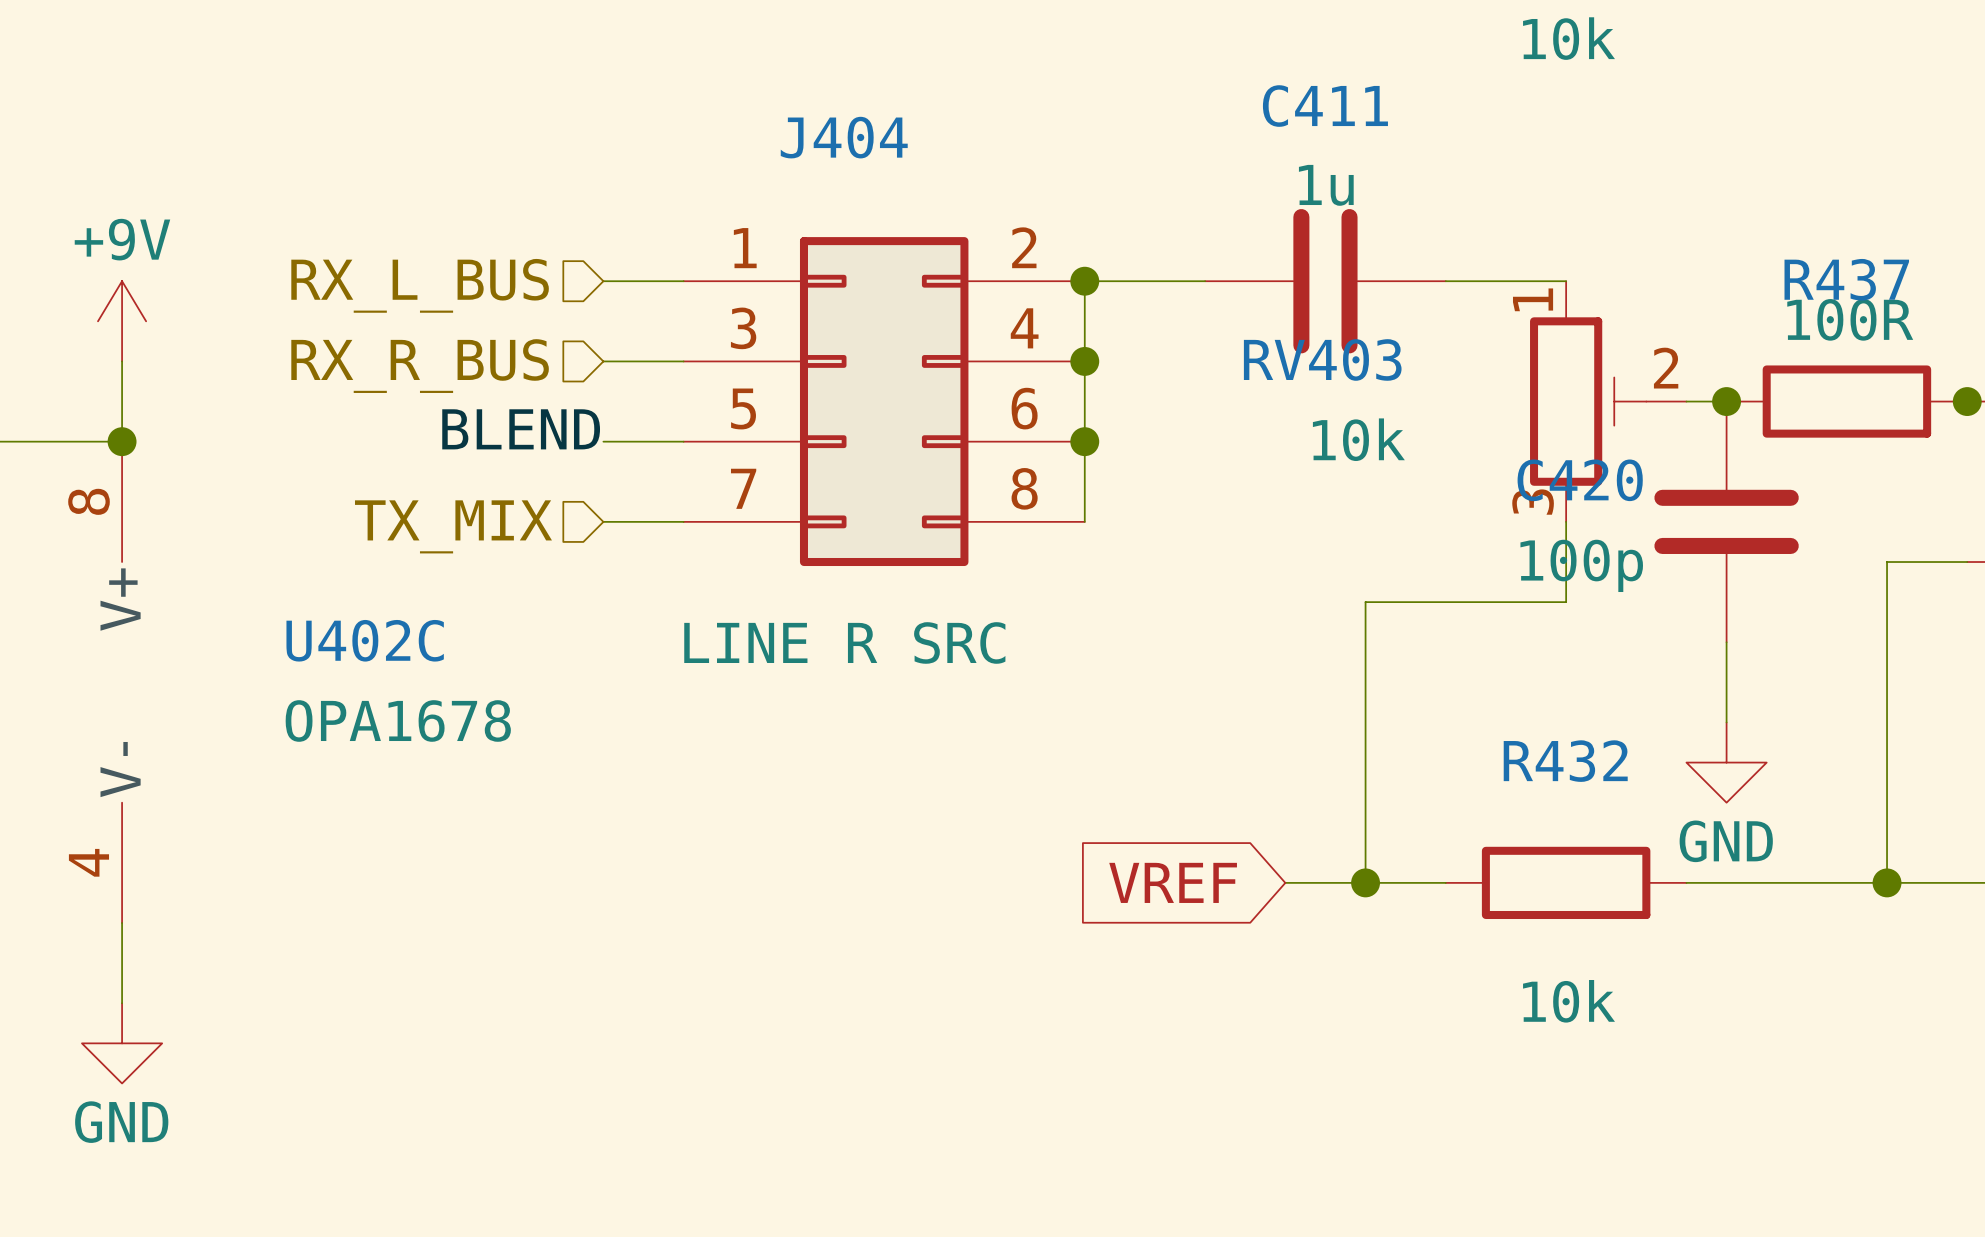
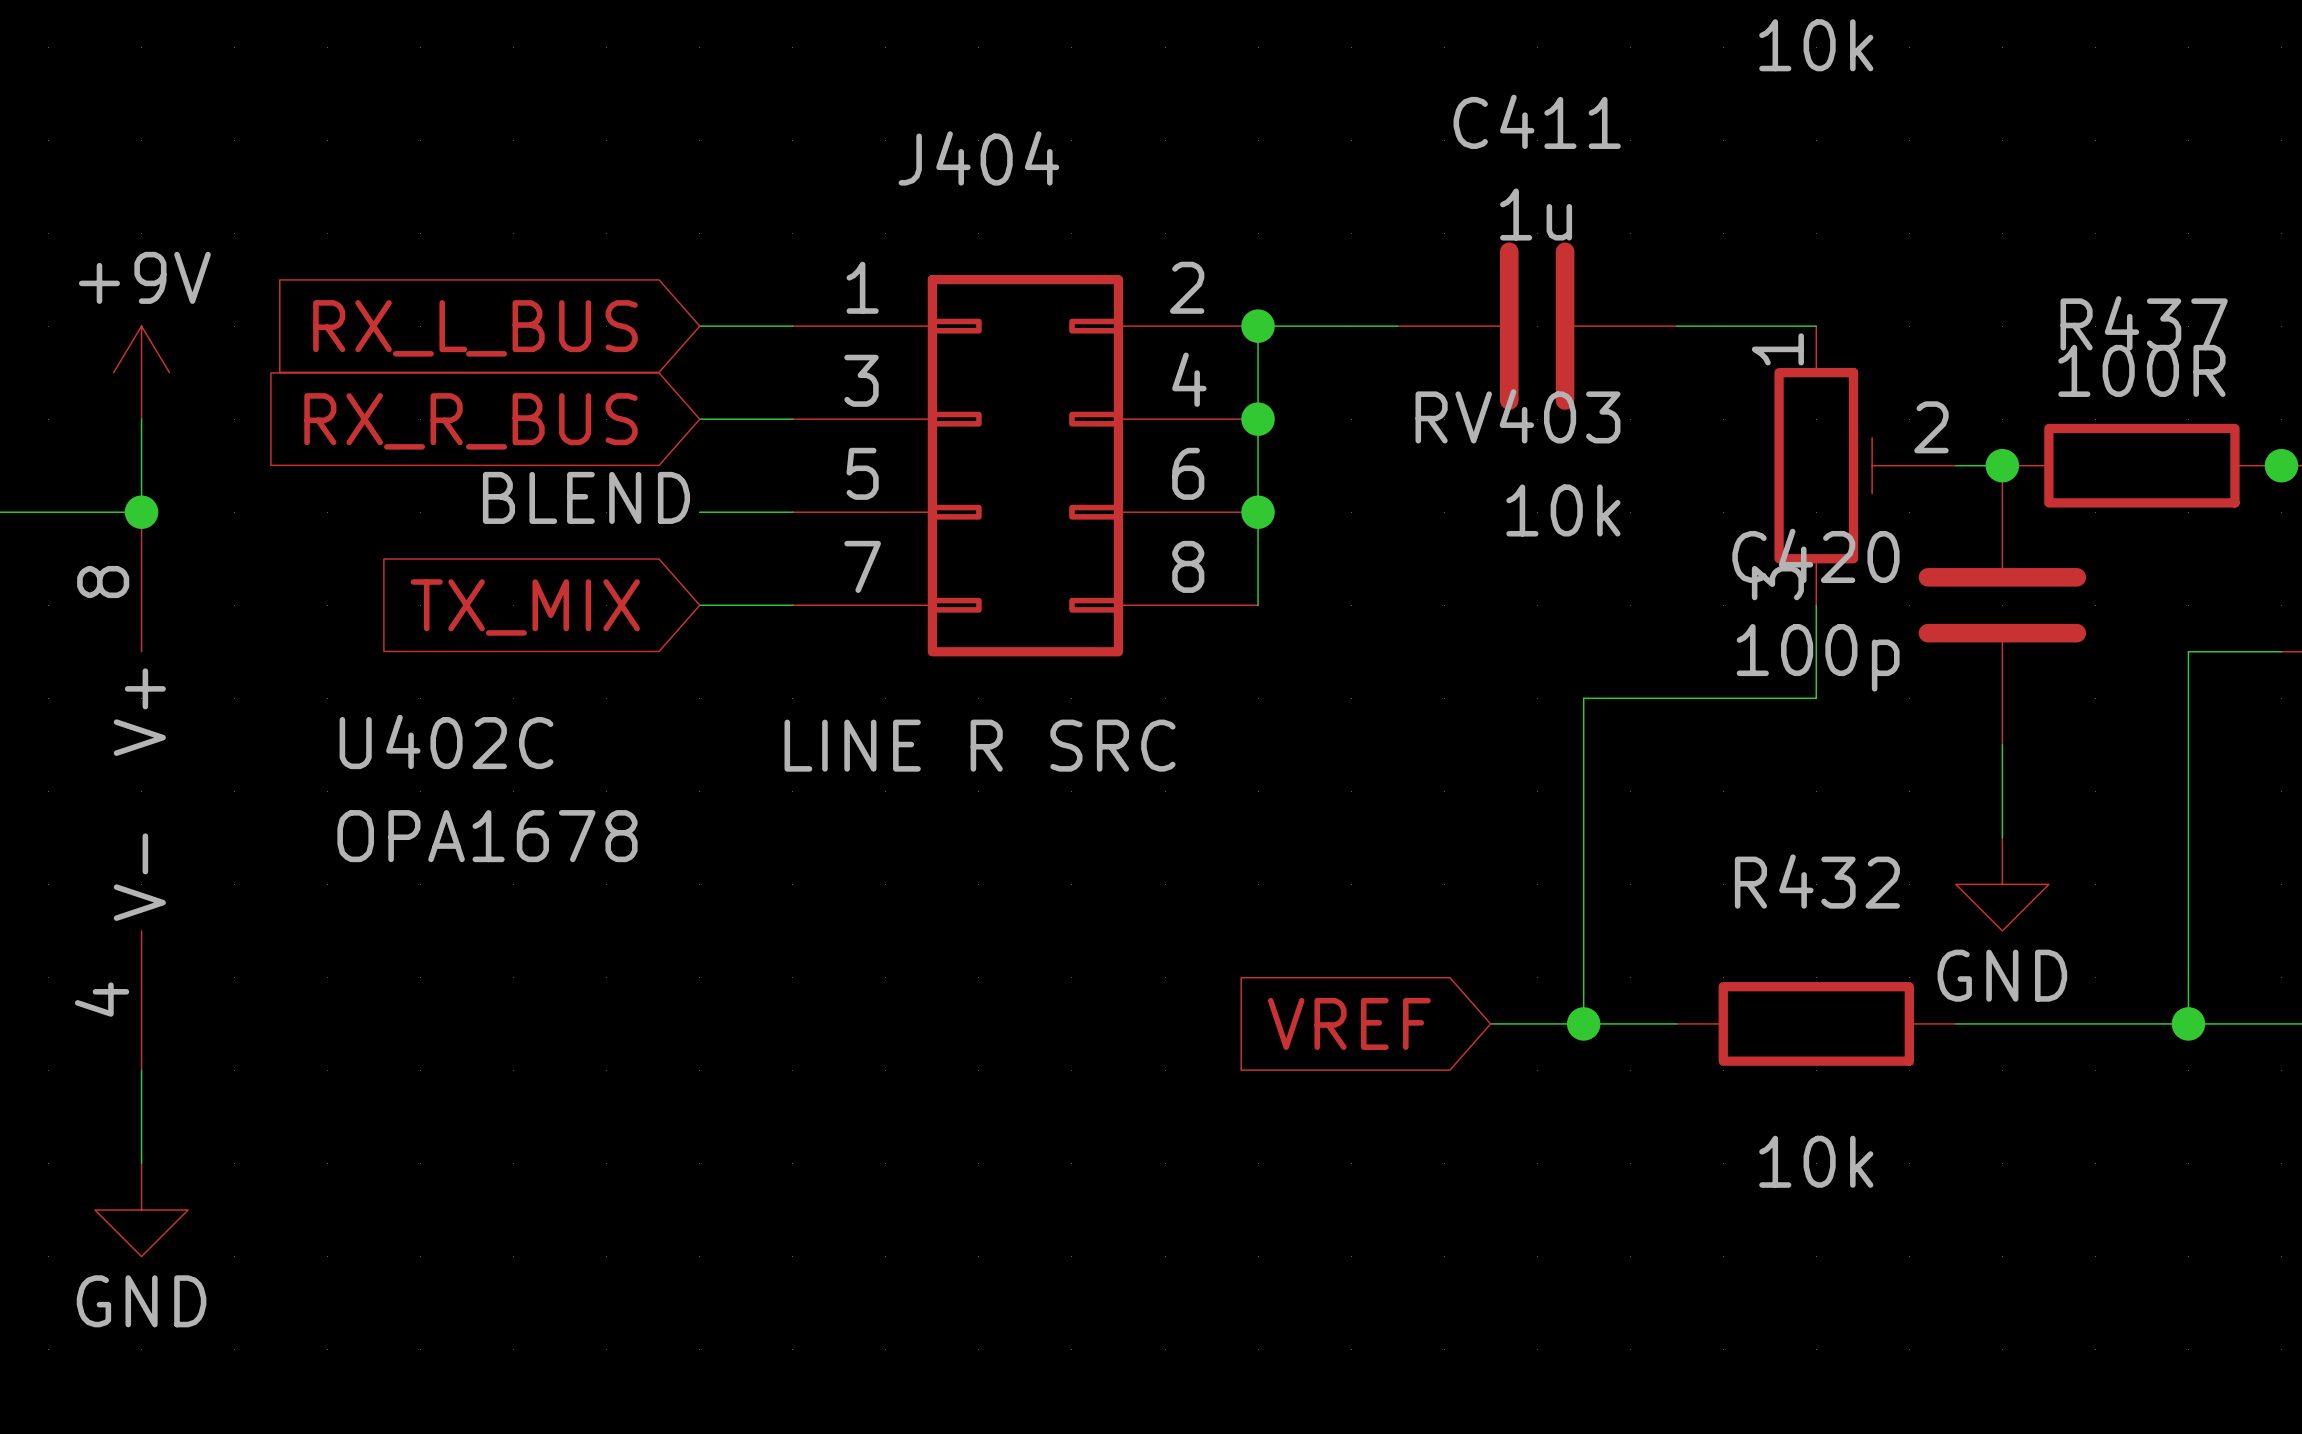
hierarchical label: RX_L_BUS (420, 285) -> none
global label: none -> RX_L_BUS (475, 328)
hierarchical label: RX_R_BUS (420, 366) -> none
global label: none -> RX_R_BUS (471, 421)
hierarchical label: TX_MIX (453, 526) -> none
global label: none -> TX_MIX (525, 607)

